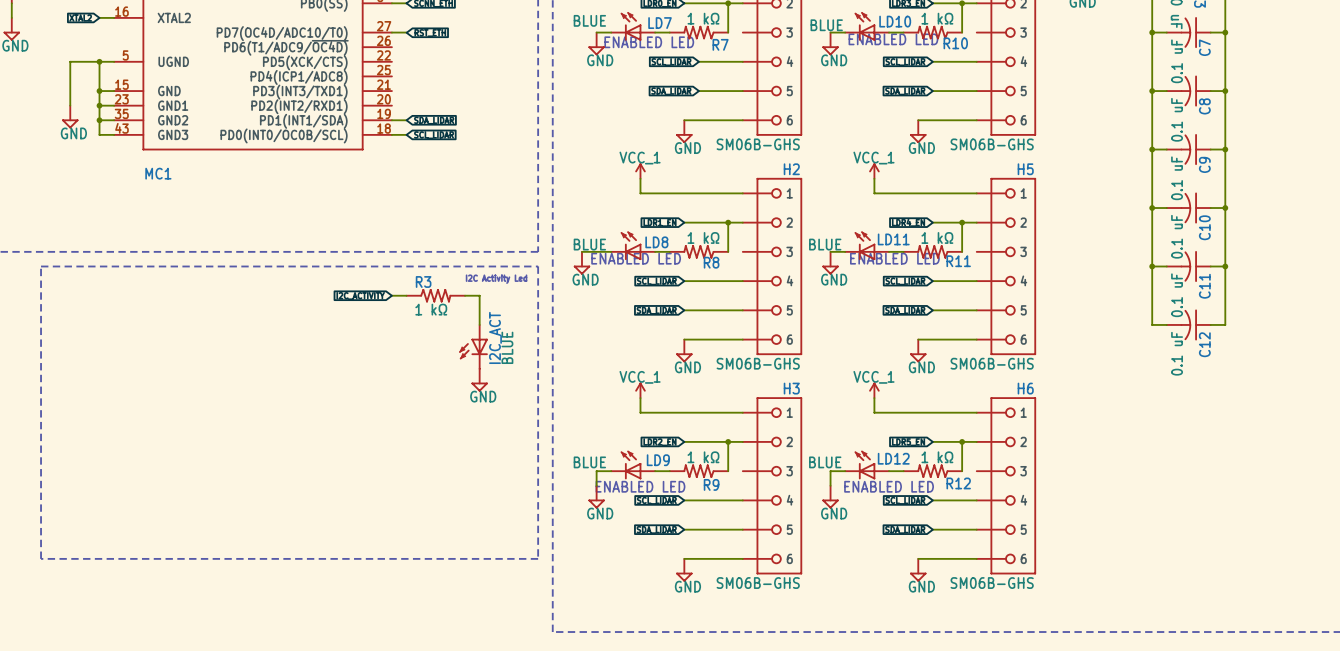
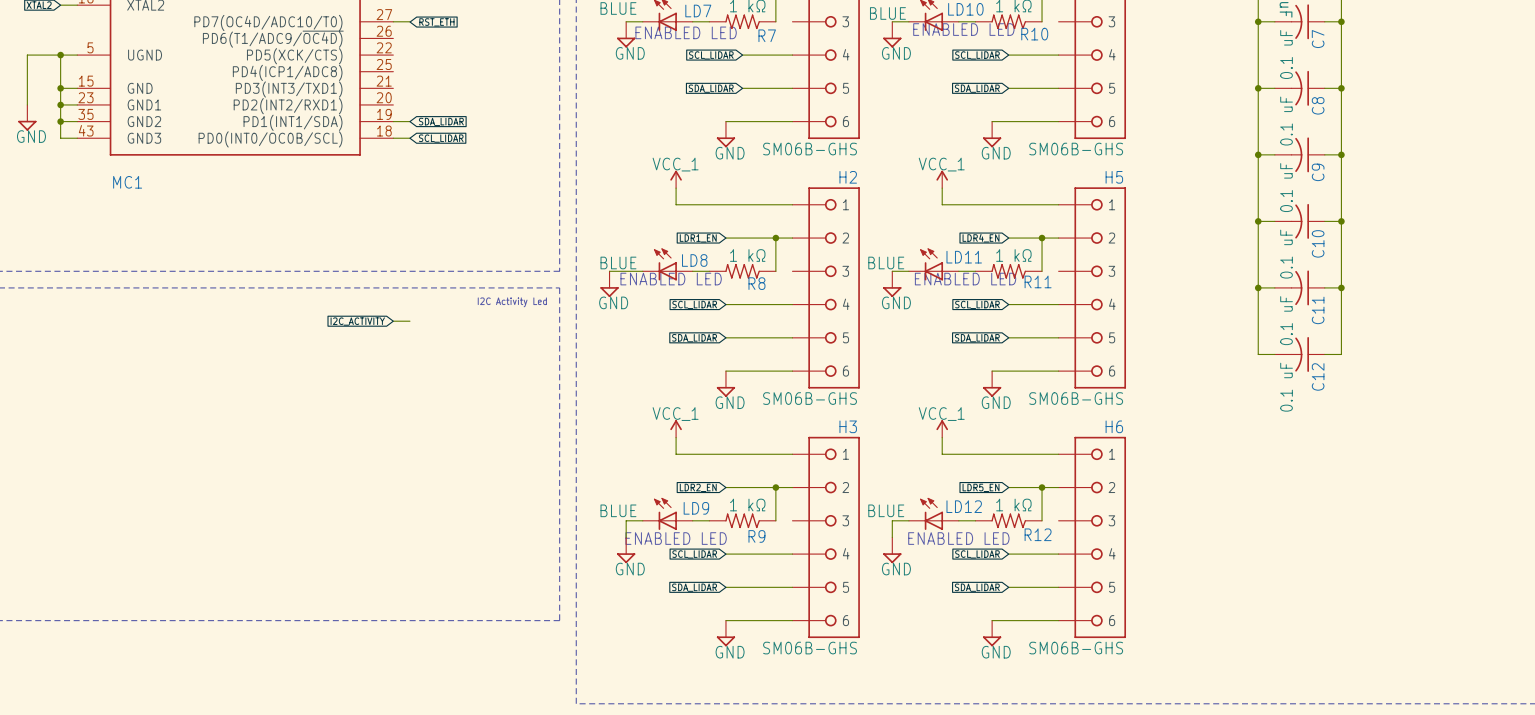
R3: 1 kΩ (435, 295) -> none
wire: (465, 295) (479, 295) (479, 324) -> none
I2C_ACT: BLUE (473, 346) -> none
power symbol: GND (479, 380) -> none

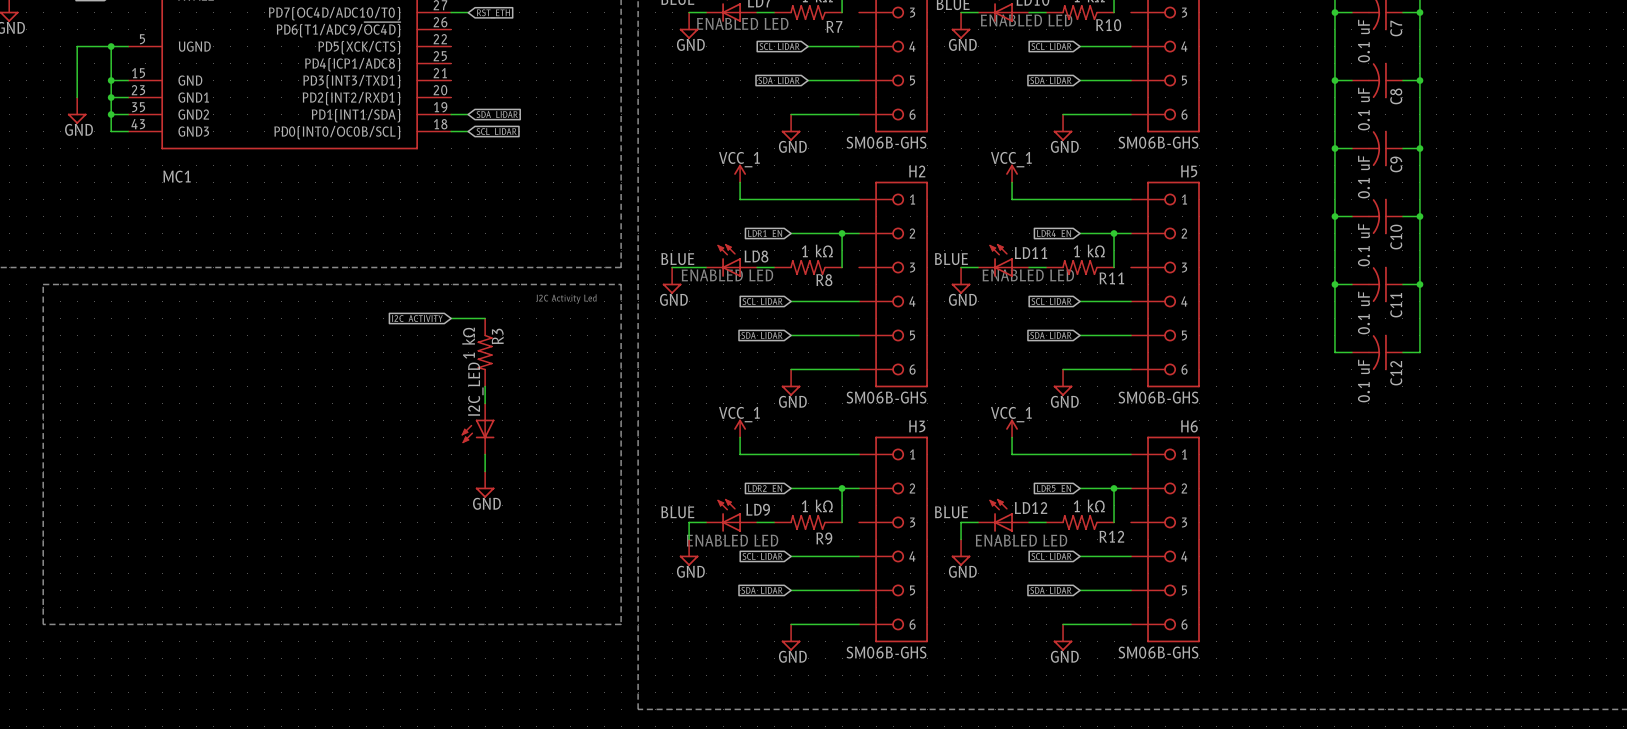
wire: none -> (468, 318) (485, 318)
R3: none -> 1 kΩ (485, 352)
wire: none -> (485, 386) (485, 403)
I2C_LED: none -> (478, 428)
wire: none -> (485, 454) (485, 471)
power symbol: none -> GND (485, 484)

